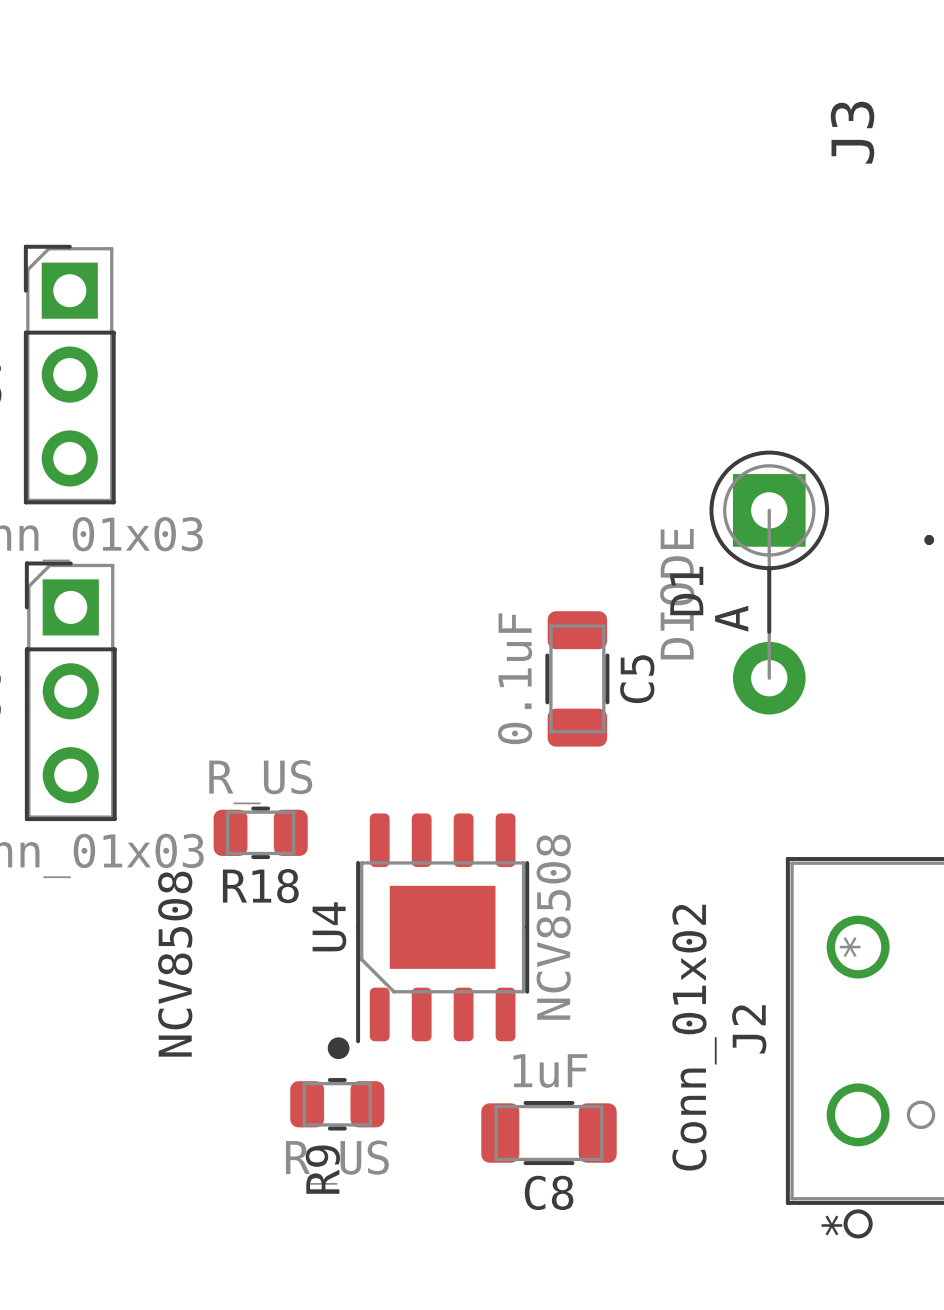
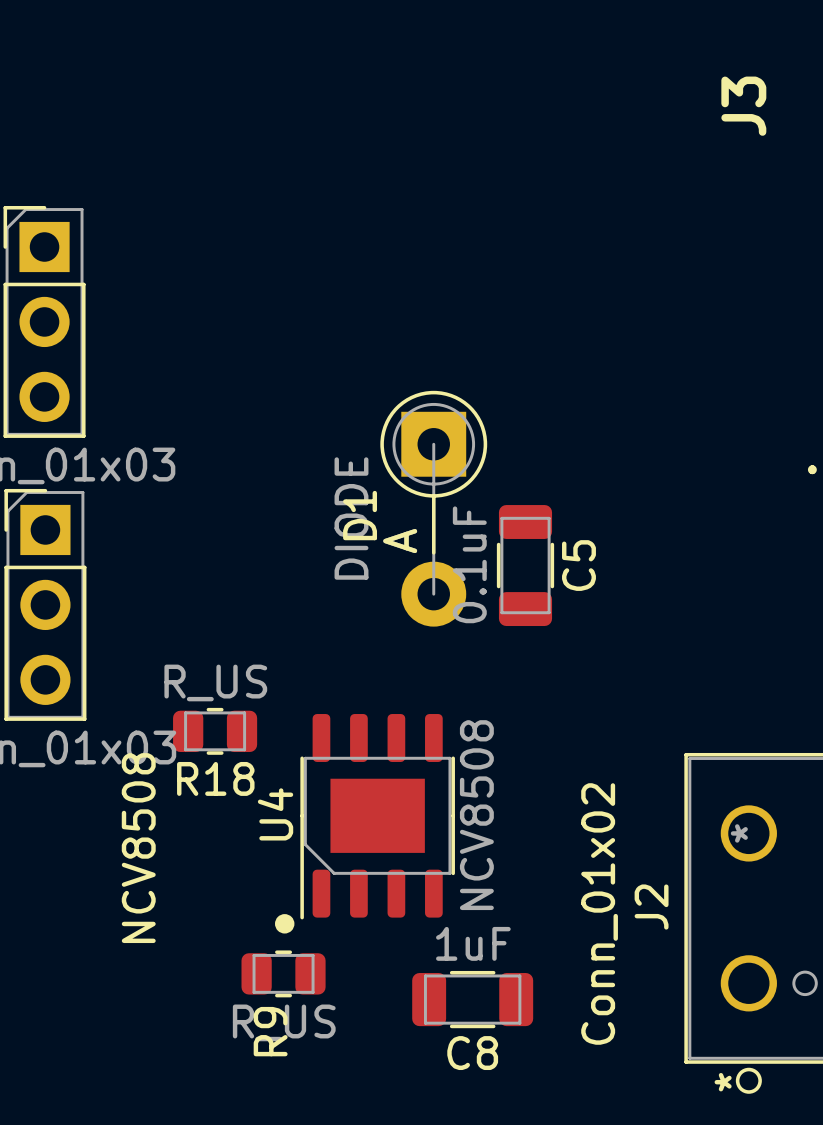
D1 position: (769, 582) -> (433, 508)
C5 position: (577, 678) -> (525, 565)

